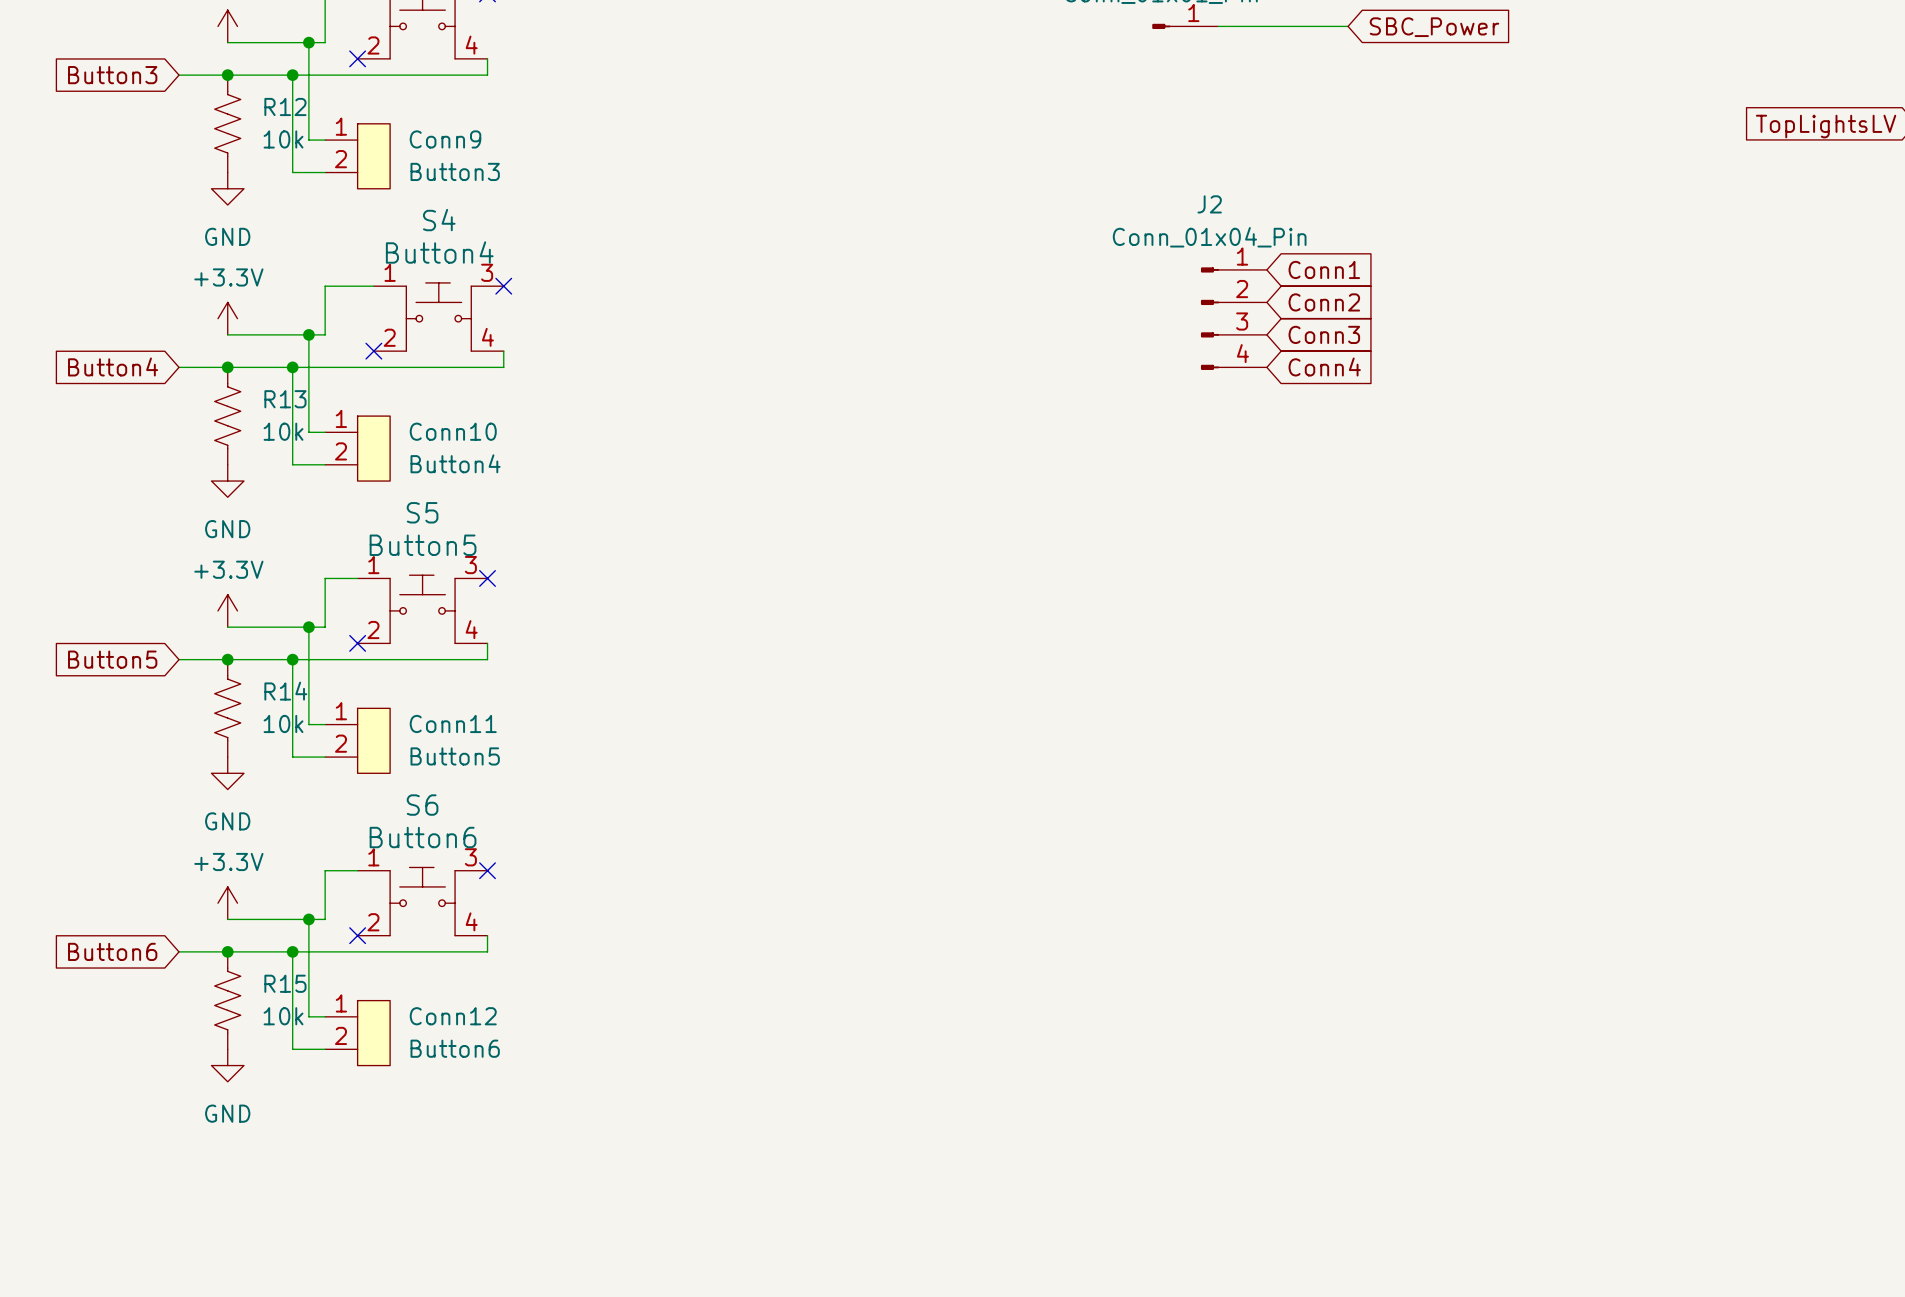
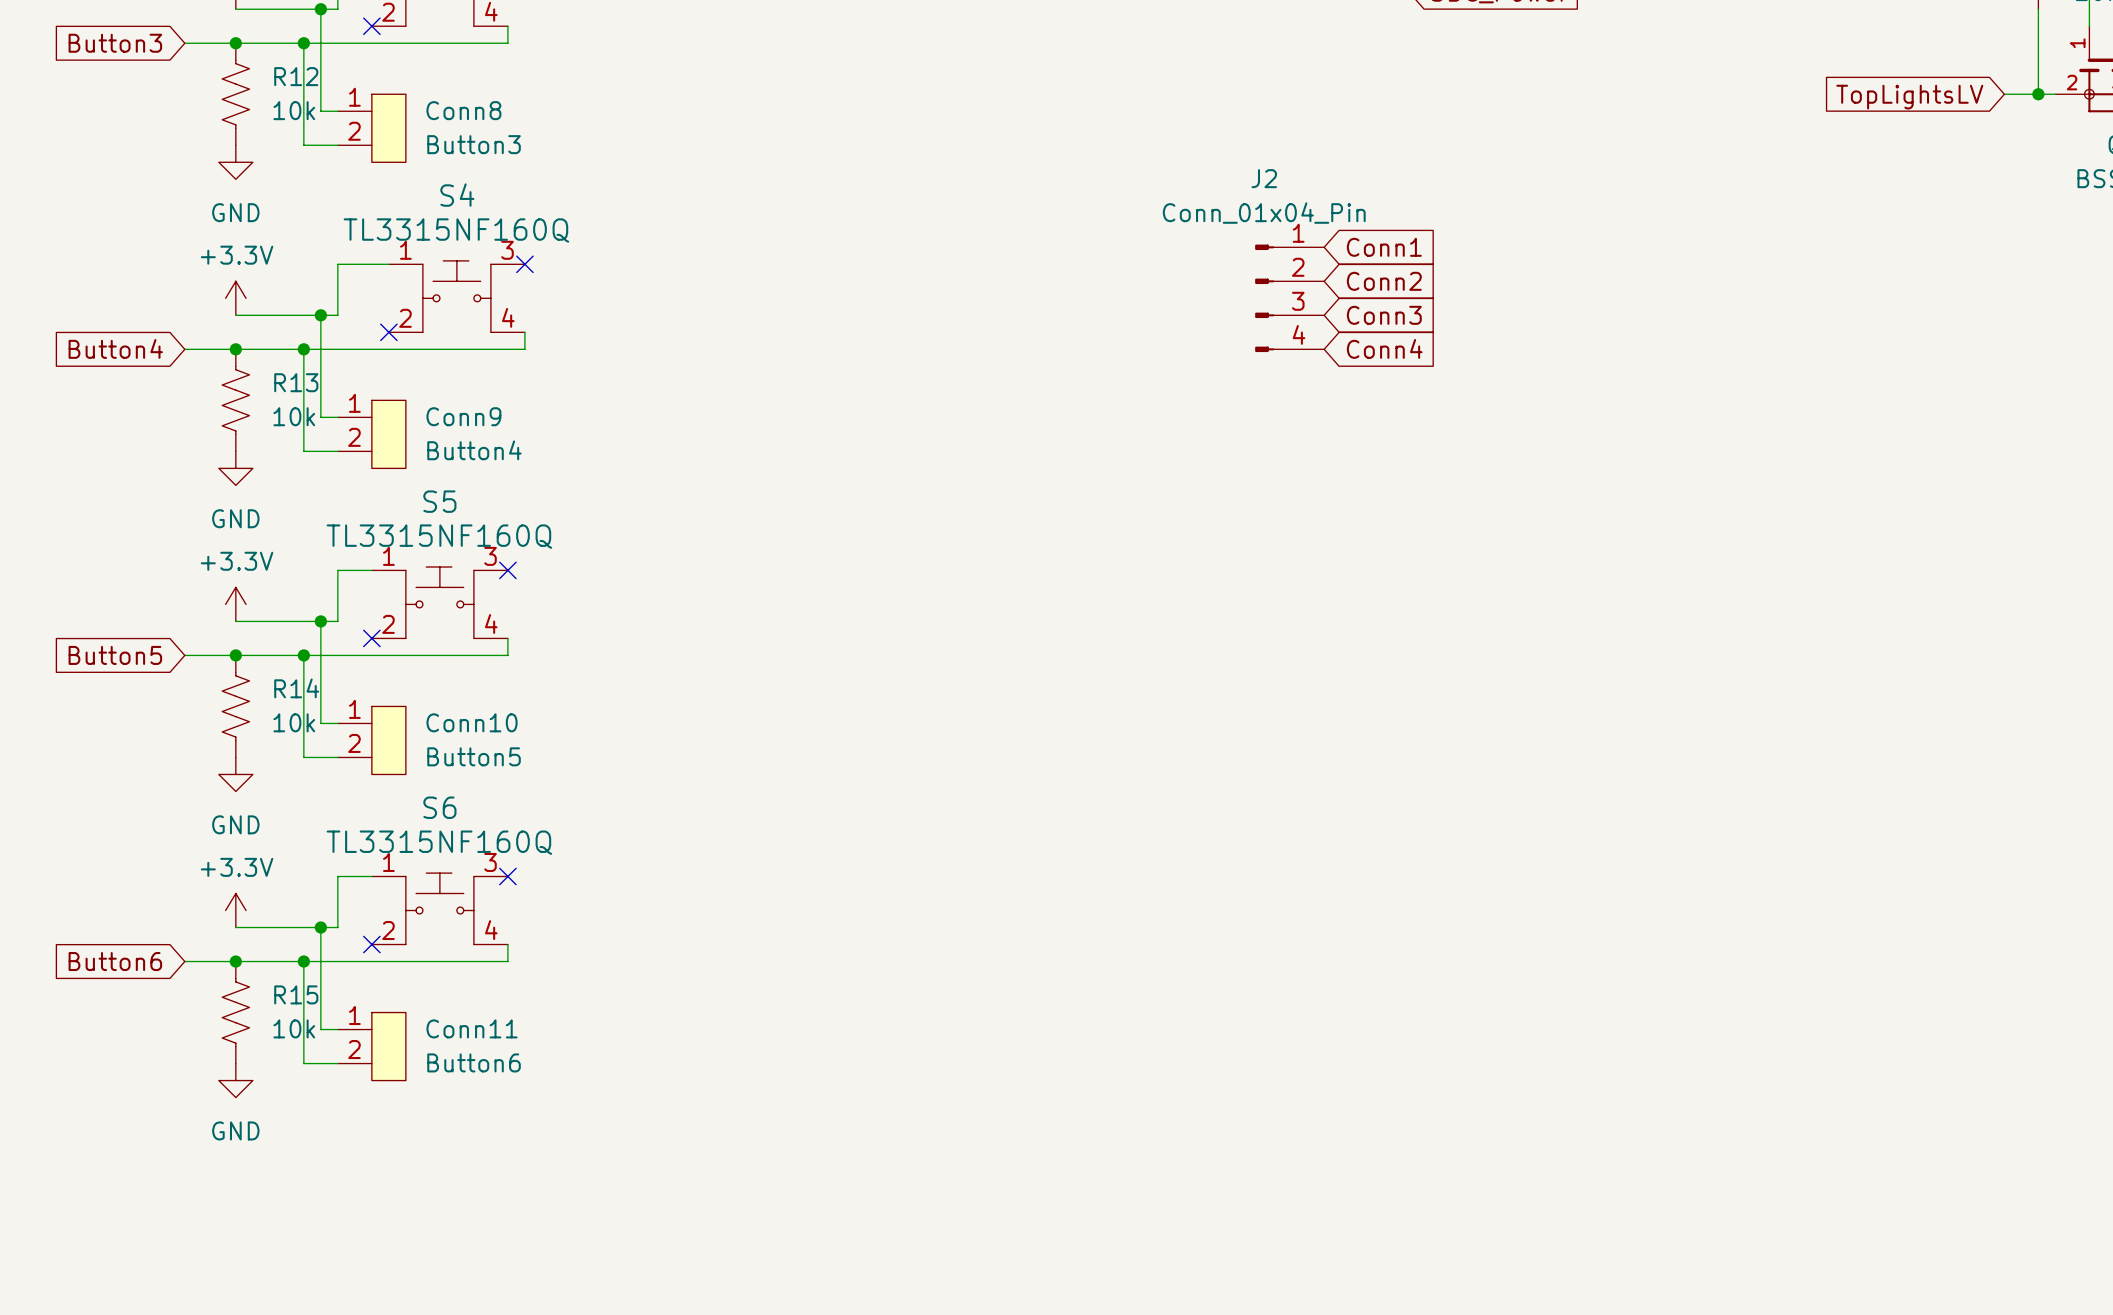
Conn9 name: Conn9 (445, 139) -> Conn8 (463, 110)
S4 value: Button4 (439, 252) -> TL3315NF160Q (456, 230)
Conn10 name: Conn10 (453, 431) -> Conn9 (463, 416)
S5 value: Button5 (423, 545) -> TL3315NF160Q (439, 536)
Conn11 name: Conn11 (453, 723) -> Conn10 (472, 722)
S6 value: Button6 (423, 837) -> TL3315NF160Q (439, 842)
Conn12 name: Conn12 (453, 1016) -> Conn11 (472, 1028)

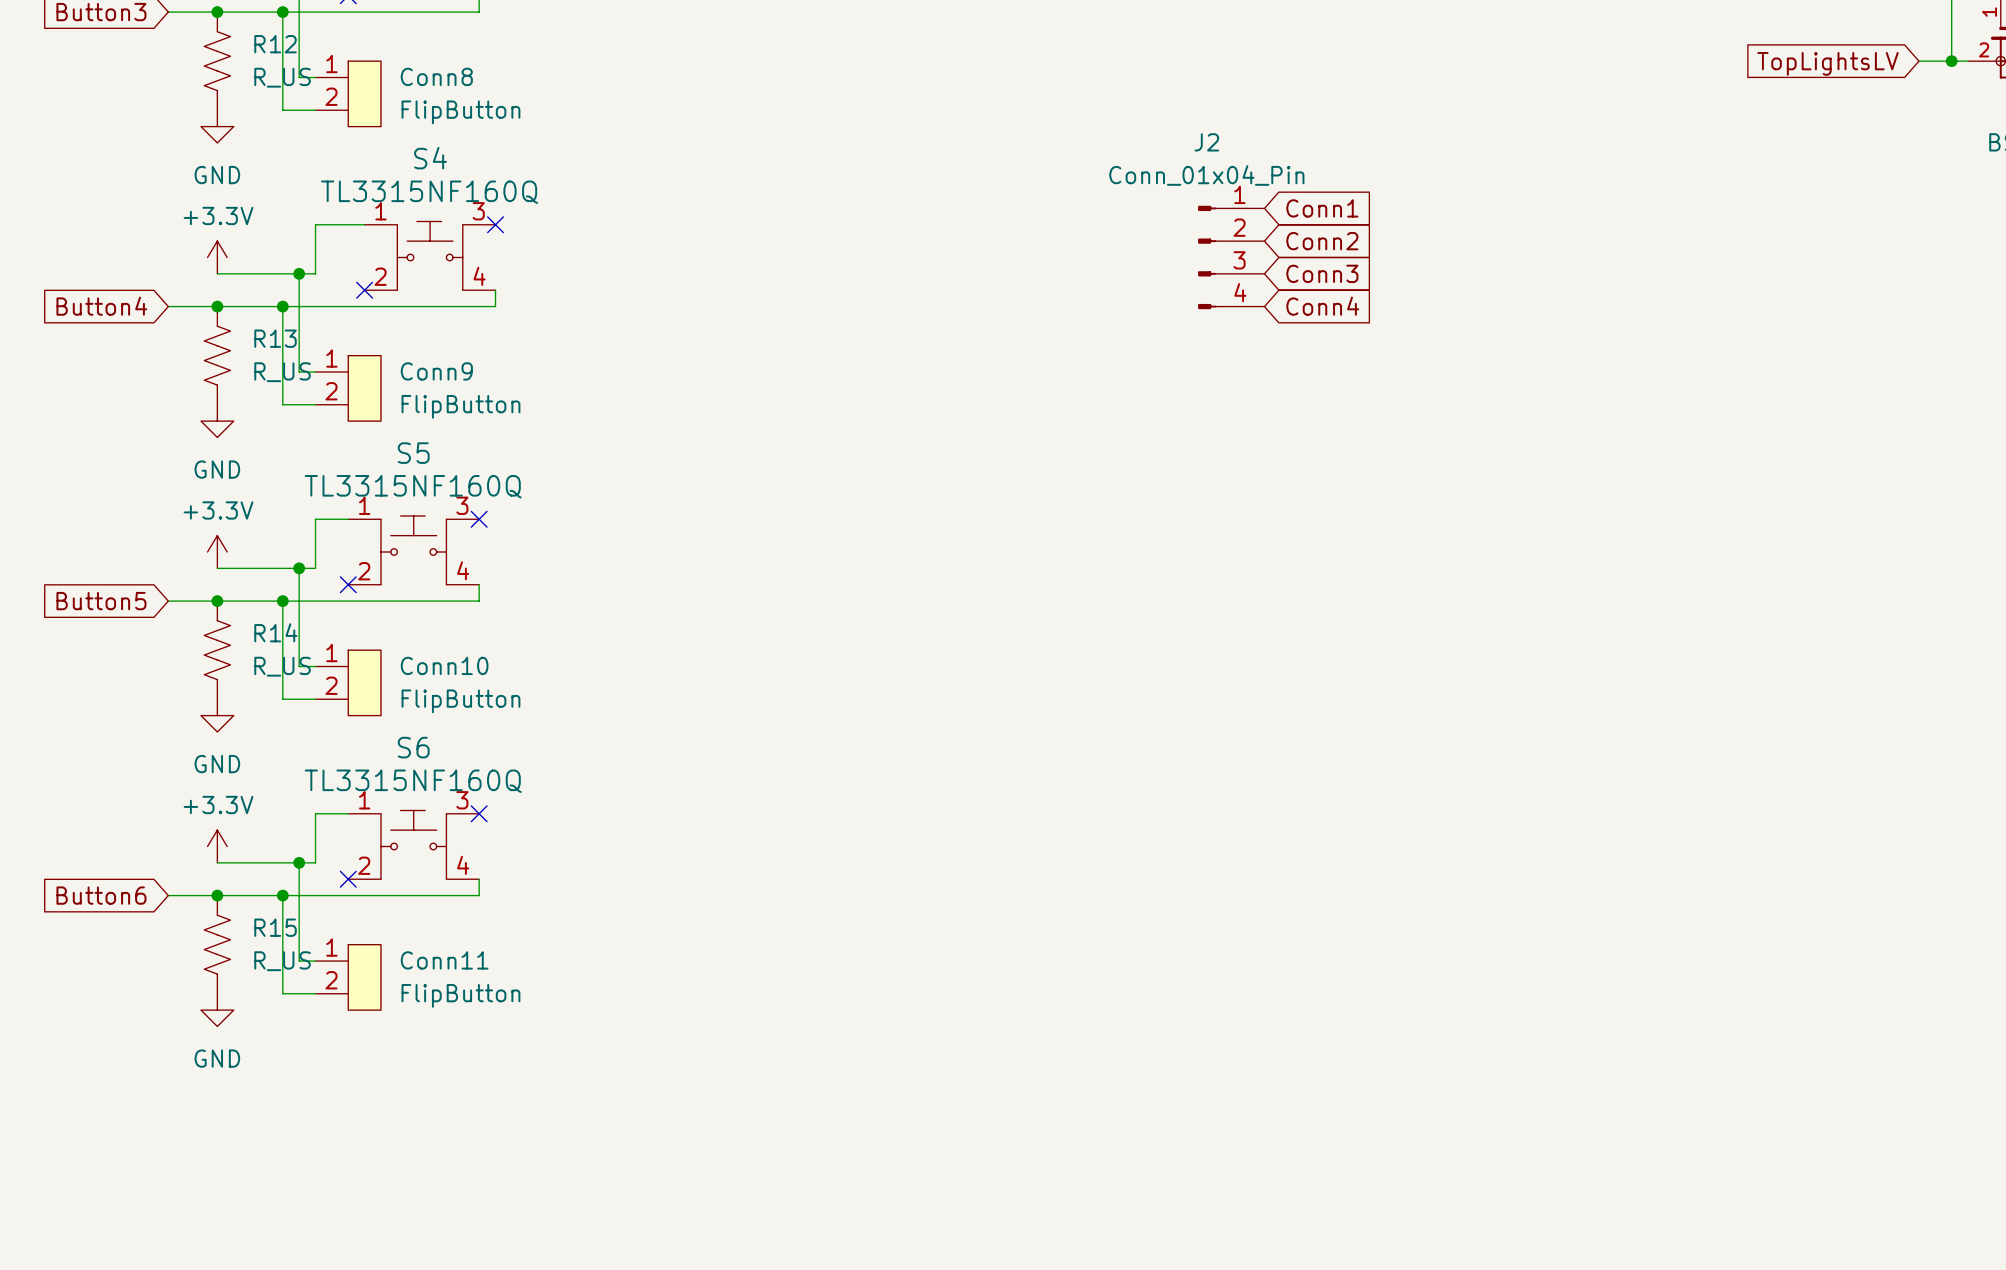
R12 value: 10k (294, 110) -> R_US (282, 77)
Conn8 value: Button3 (474, 144) -> FlipButton (460, 112)
R13 value: 10k (294, 416) -> R_US (282, 372)
Conn9 value: Button4 (474, 450) -> FlipButton (460, 406)
R14 value: 10k (294, 722) -> R_US (282, 666)
Conn10 value: Button5 (474, 756) -> FlipButton (460, 701)
R15 value: 10k (294, 1028) -> R_US (282, 961)
Conn11 value: Button6 (474, 1062) -> FlipButton (460, 995)

